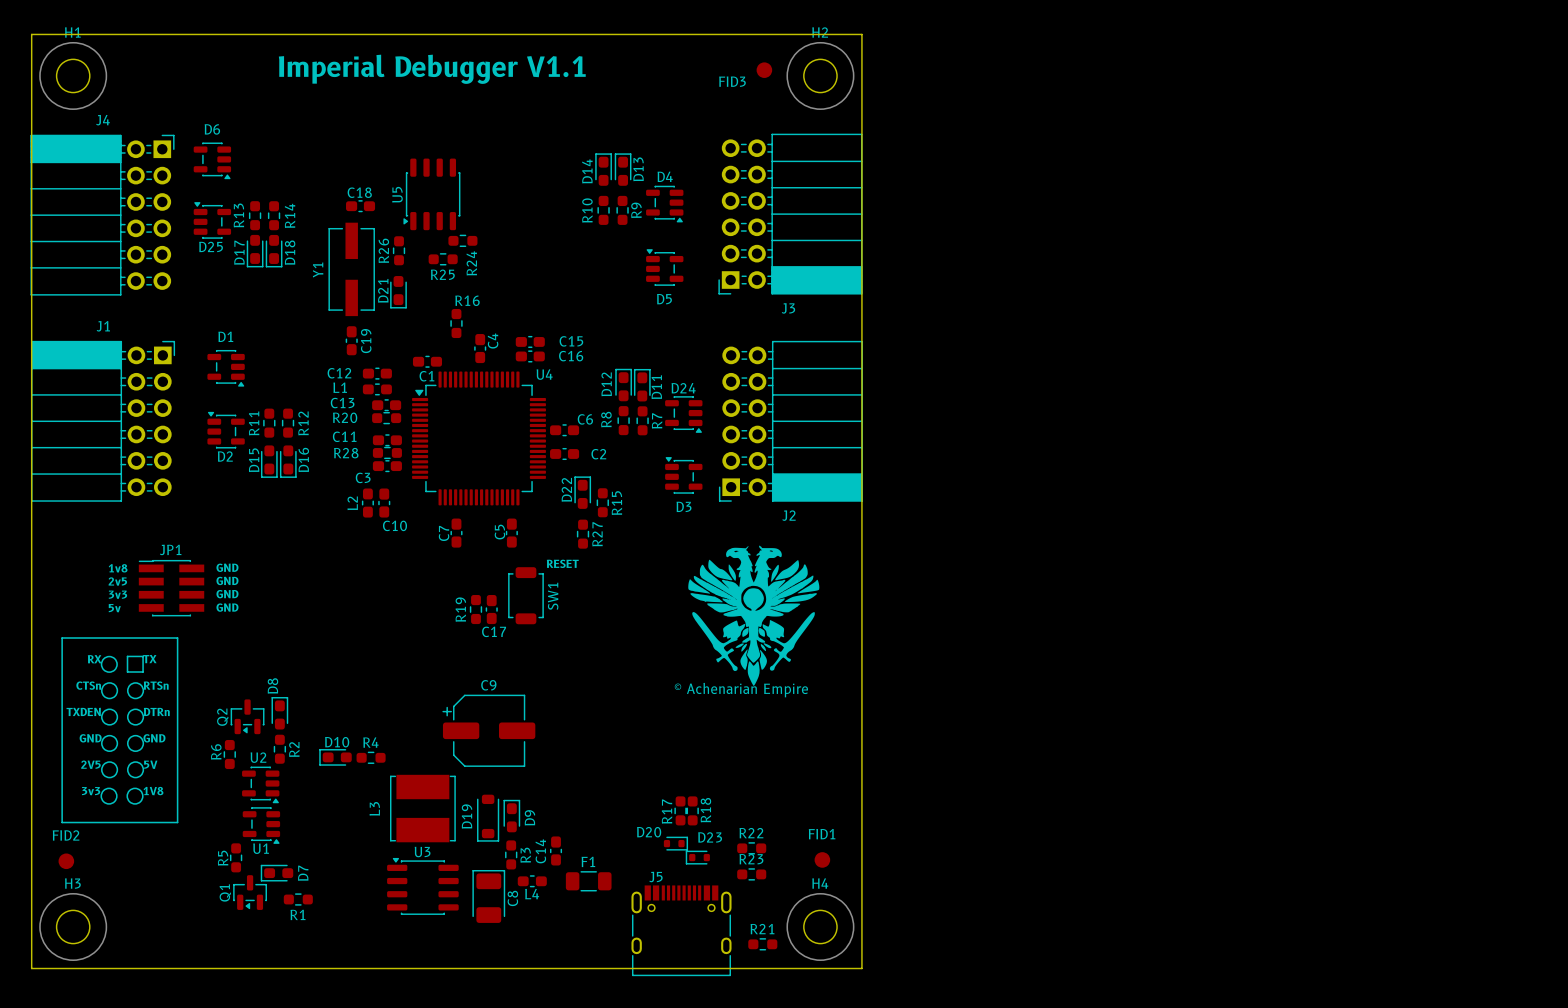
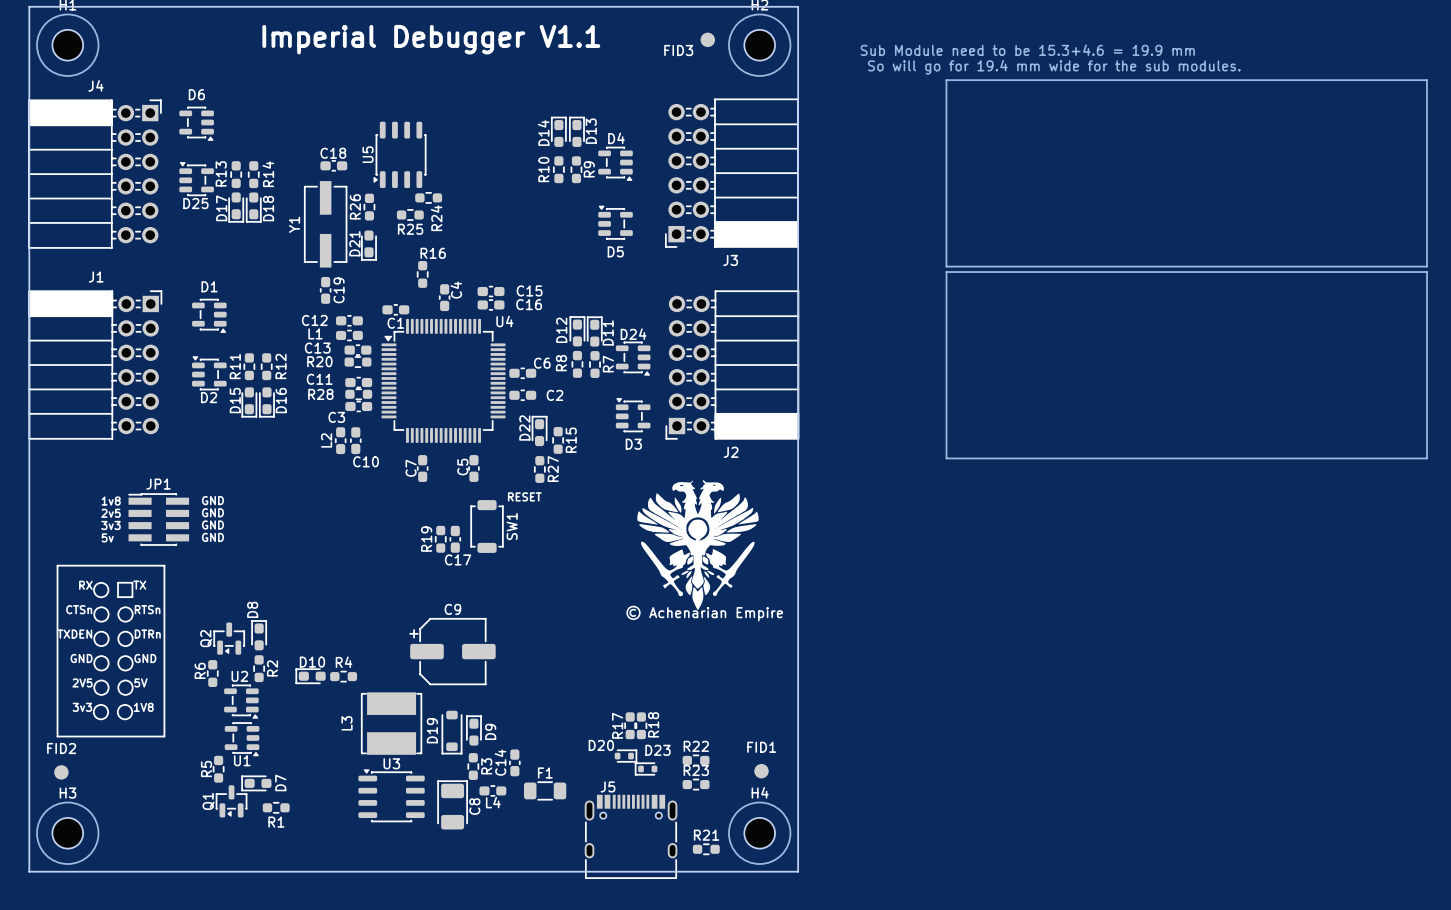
text: none -> Sub Module need to be 15.3+4.6 = 19.9 mm (1027, 50)
text: none -> So will go for 19.4 mm wide for the sub modules. (1054, 67)
line: none -> (946, 80) (1426, 80) (1426, 266) (946, 266) (946, 80)
line: none -> (946, 272) (1427, 272) (1427, 458) (946, 458) (946, 272)

